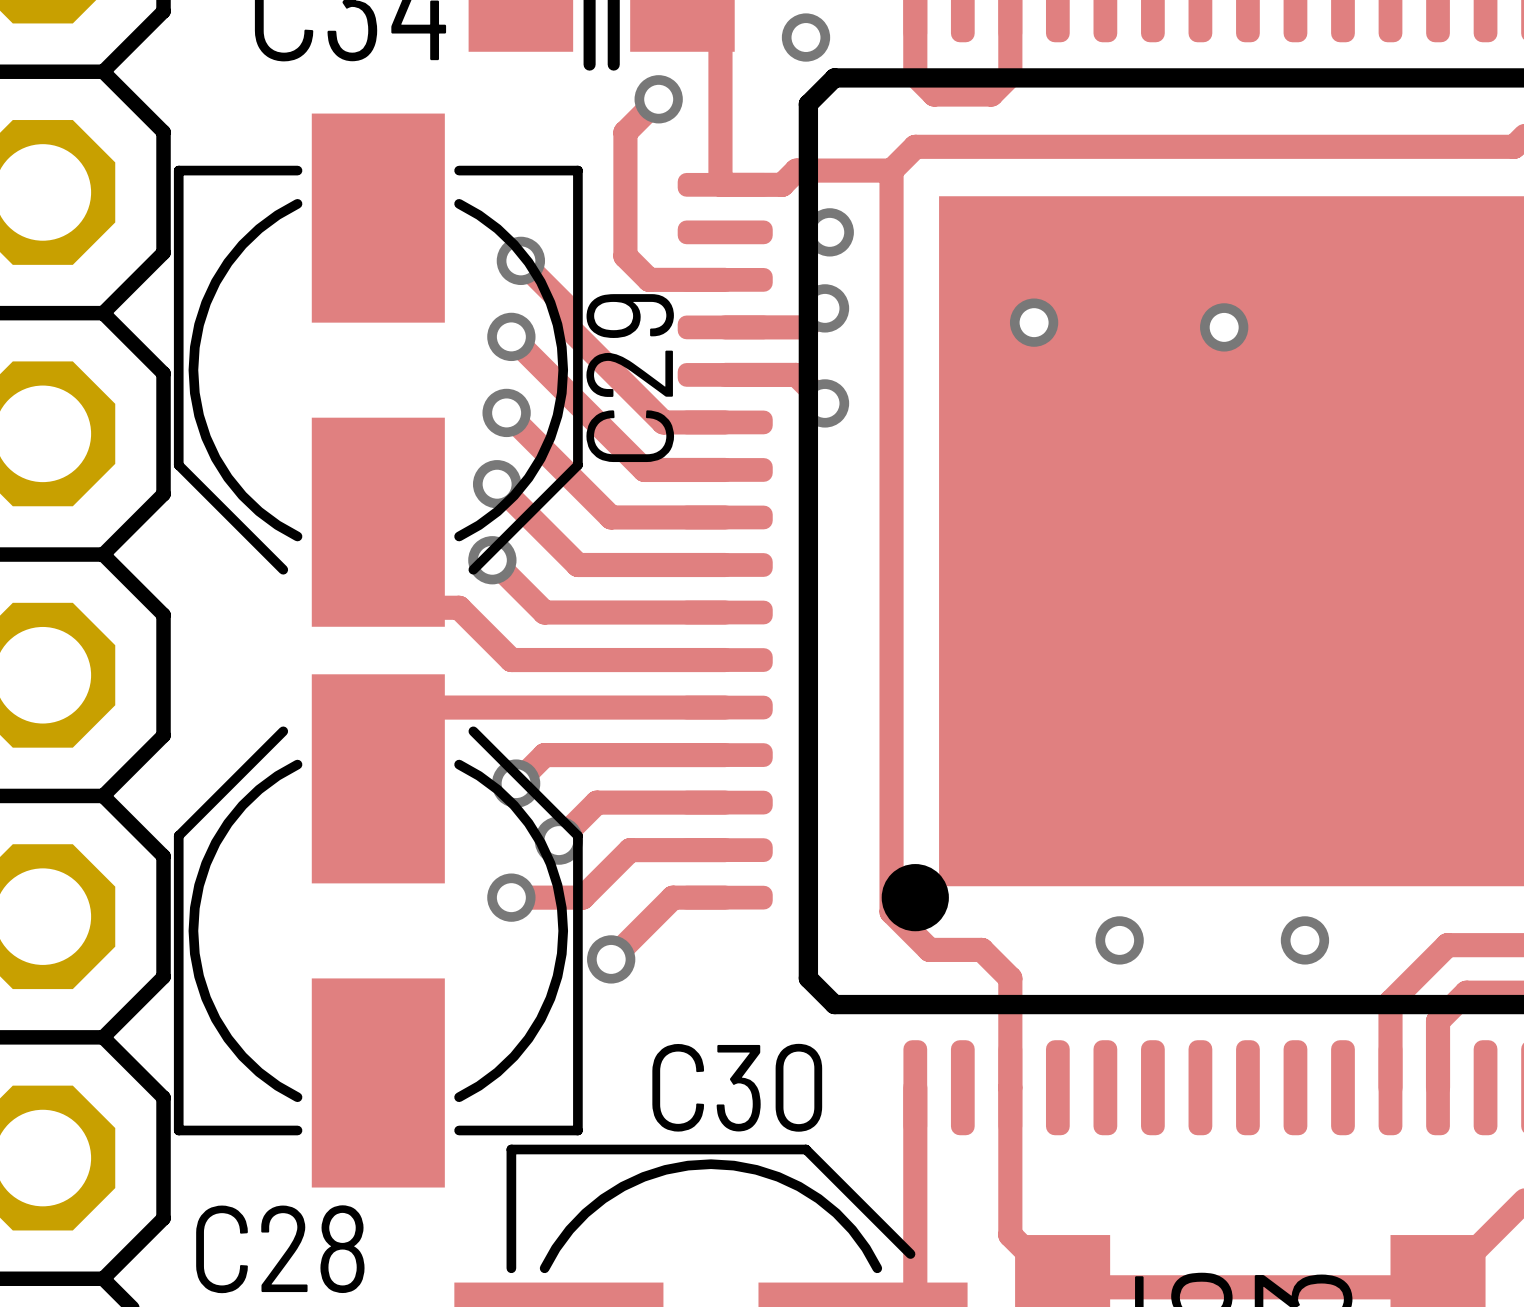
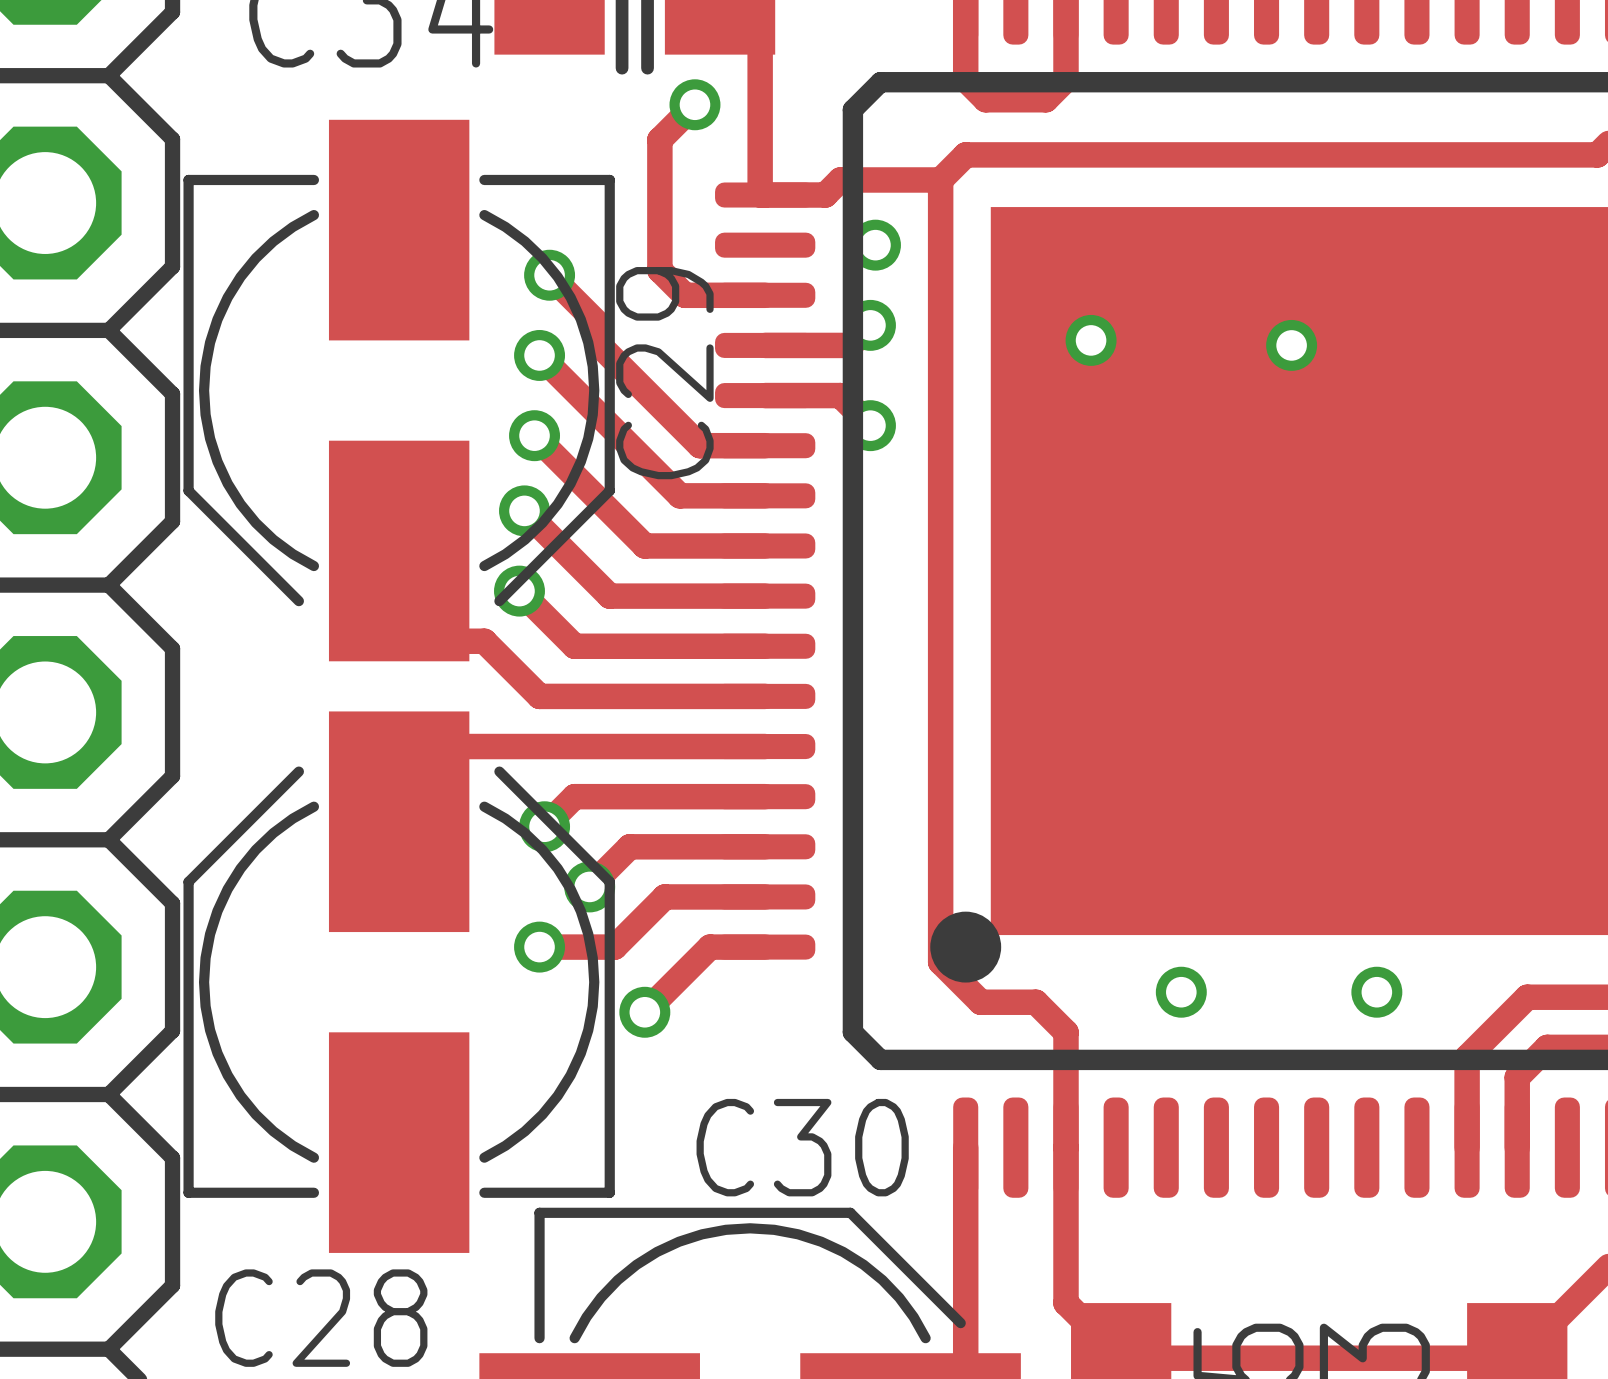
via: (806, 37) -> none

